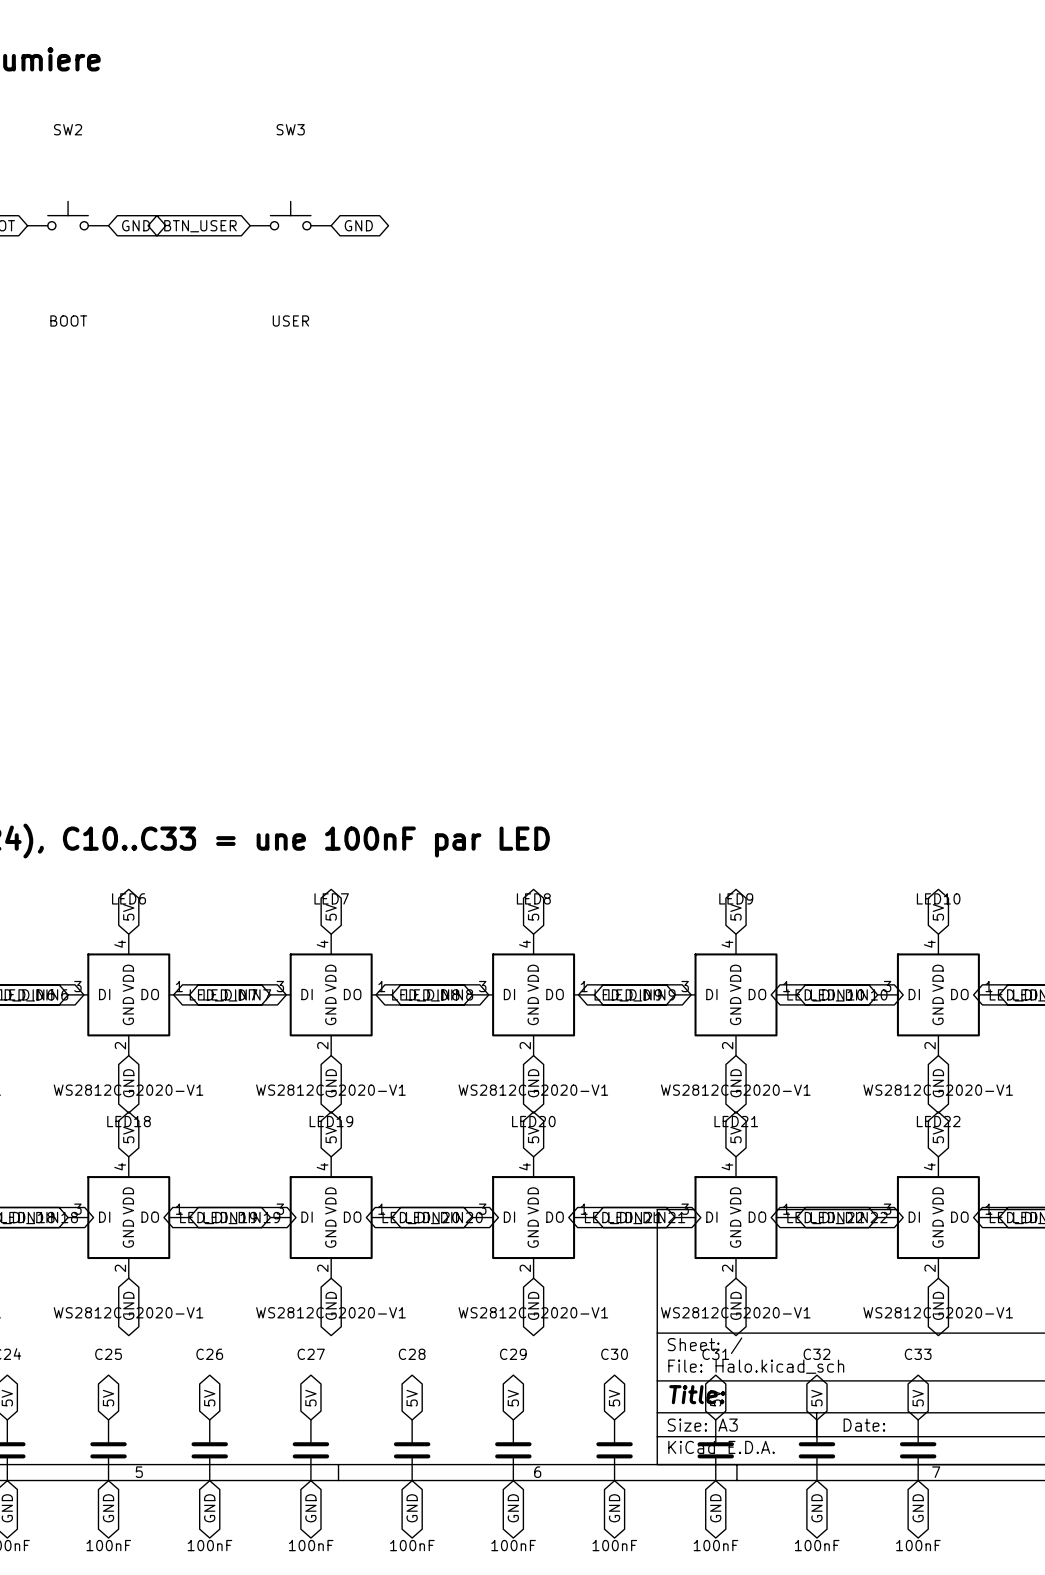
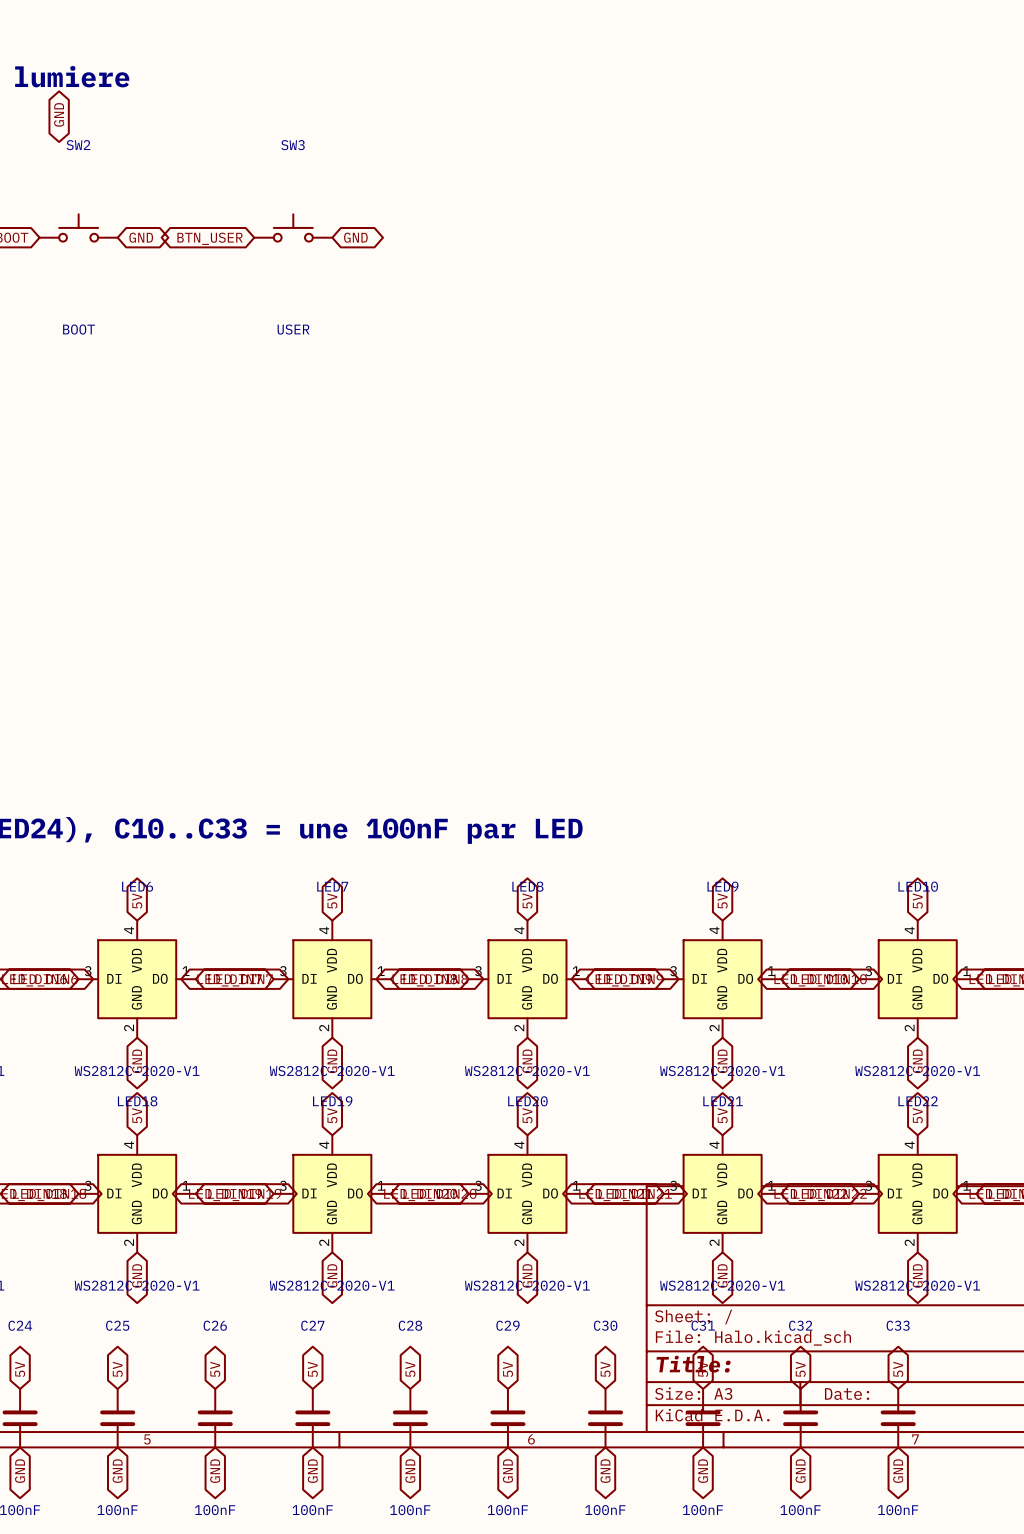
global label: none -> GND (59, 114)

